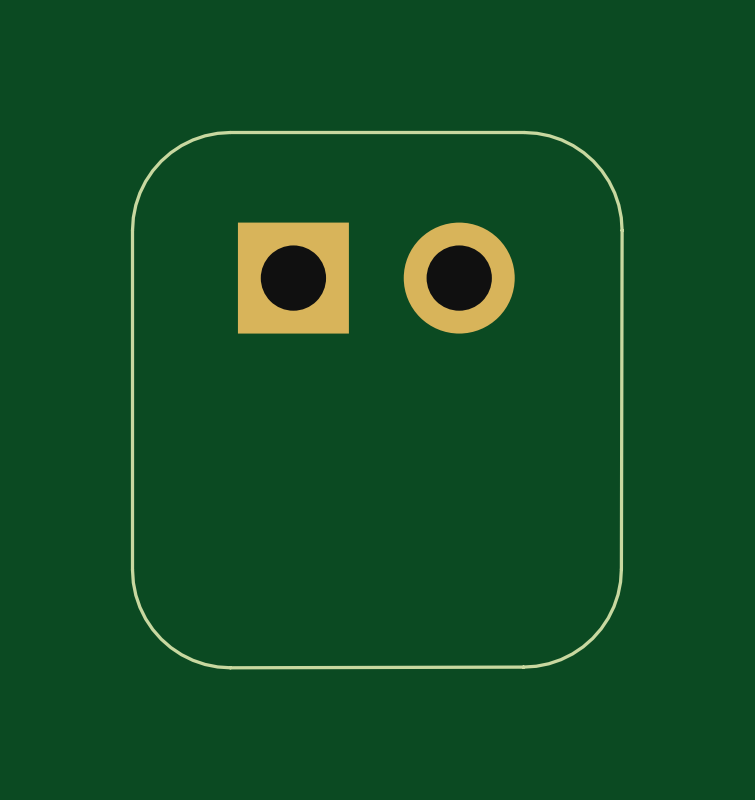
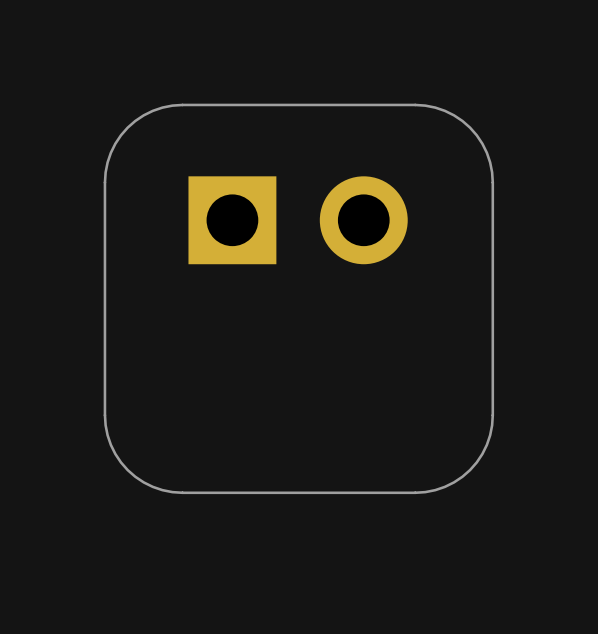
board edge: (622, 230) (620, 581) (613, 606) (608, 618) (592, 638) (572, 653) (548, 663) (523, 667) (230, 667) (205, 664) (192, 660) (170, 647) (152, 629) (145, 618) (135, 595) (133, 582) (132, 524) -> (492, 182) (492, 425) (482, 454) (470, 470) (454, 482) (435, 490) (415, 492) (172, 492) (152, 486) (127, 470) (110, 444) (104, 415)

